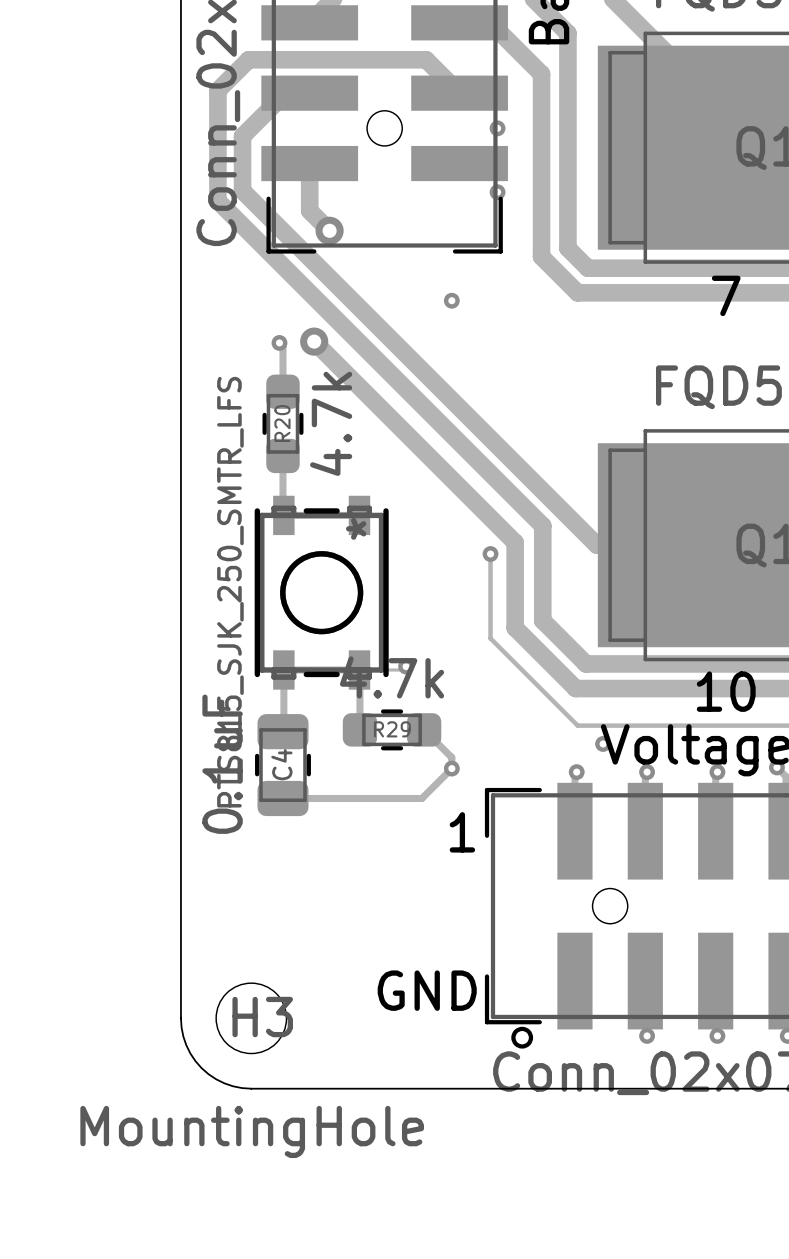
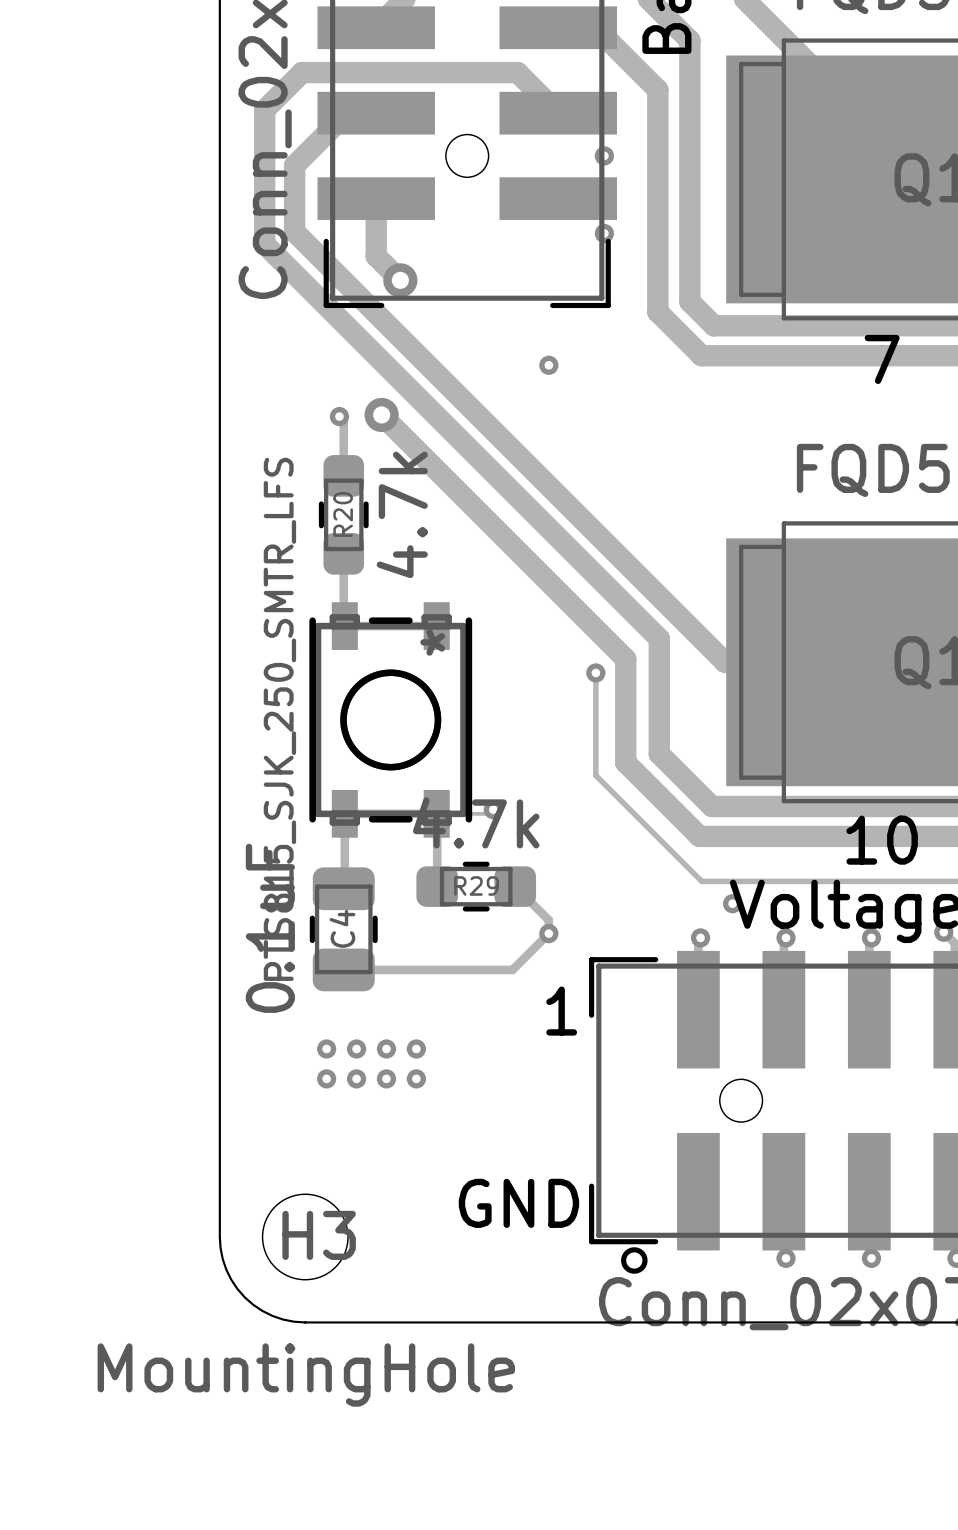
via: none -> (326, 1048)
via: none -> (356, 1048)
via: none -> (386, 1048)
via: none -> (416, 1048)
via: none -> (326, 1078)
via: none -> (356, 1078)
via: none -> (386, 1078)
via: none -> (416, 1078)

